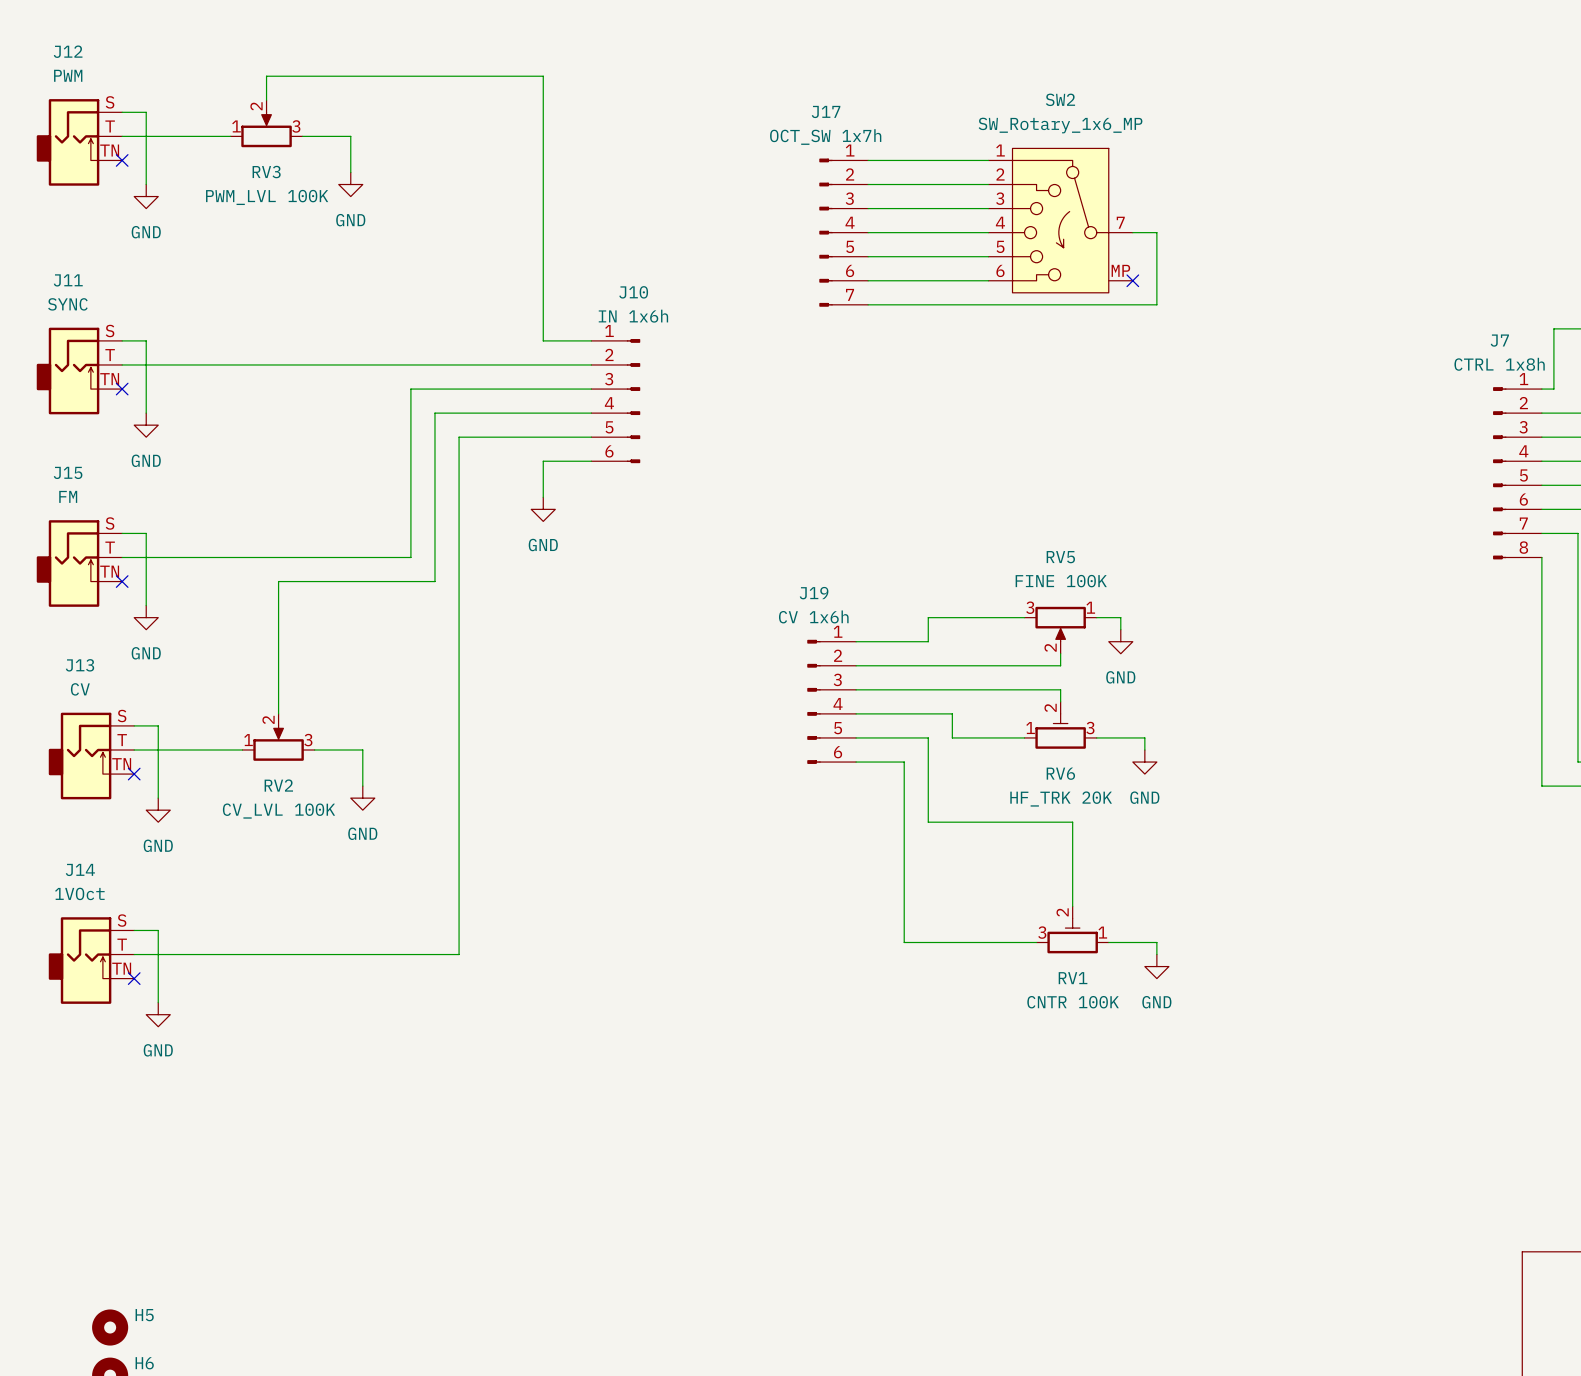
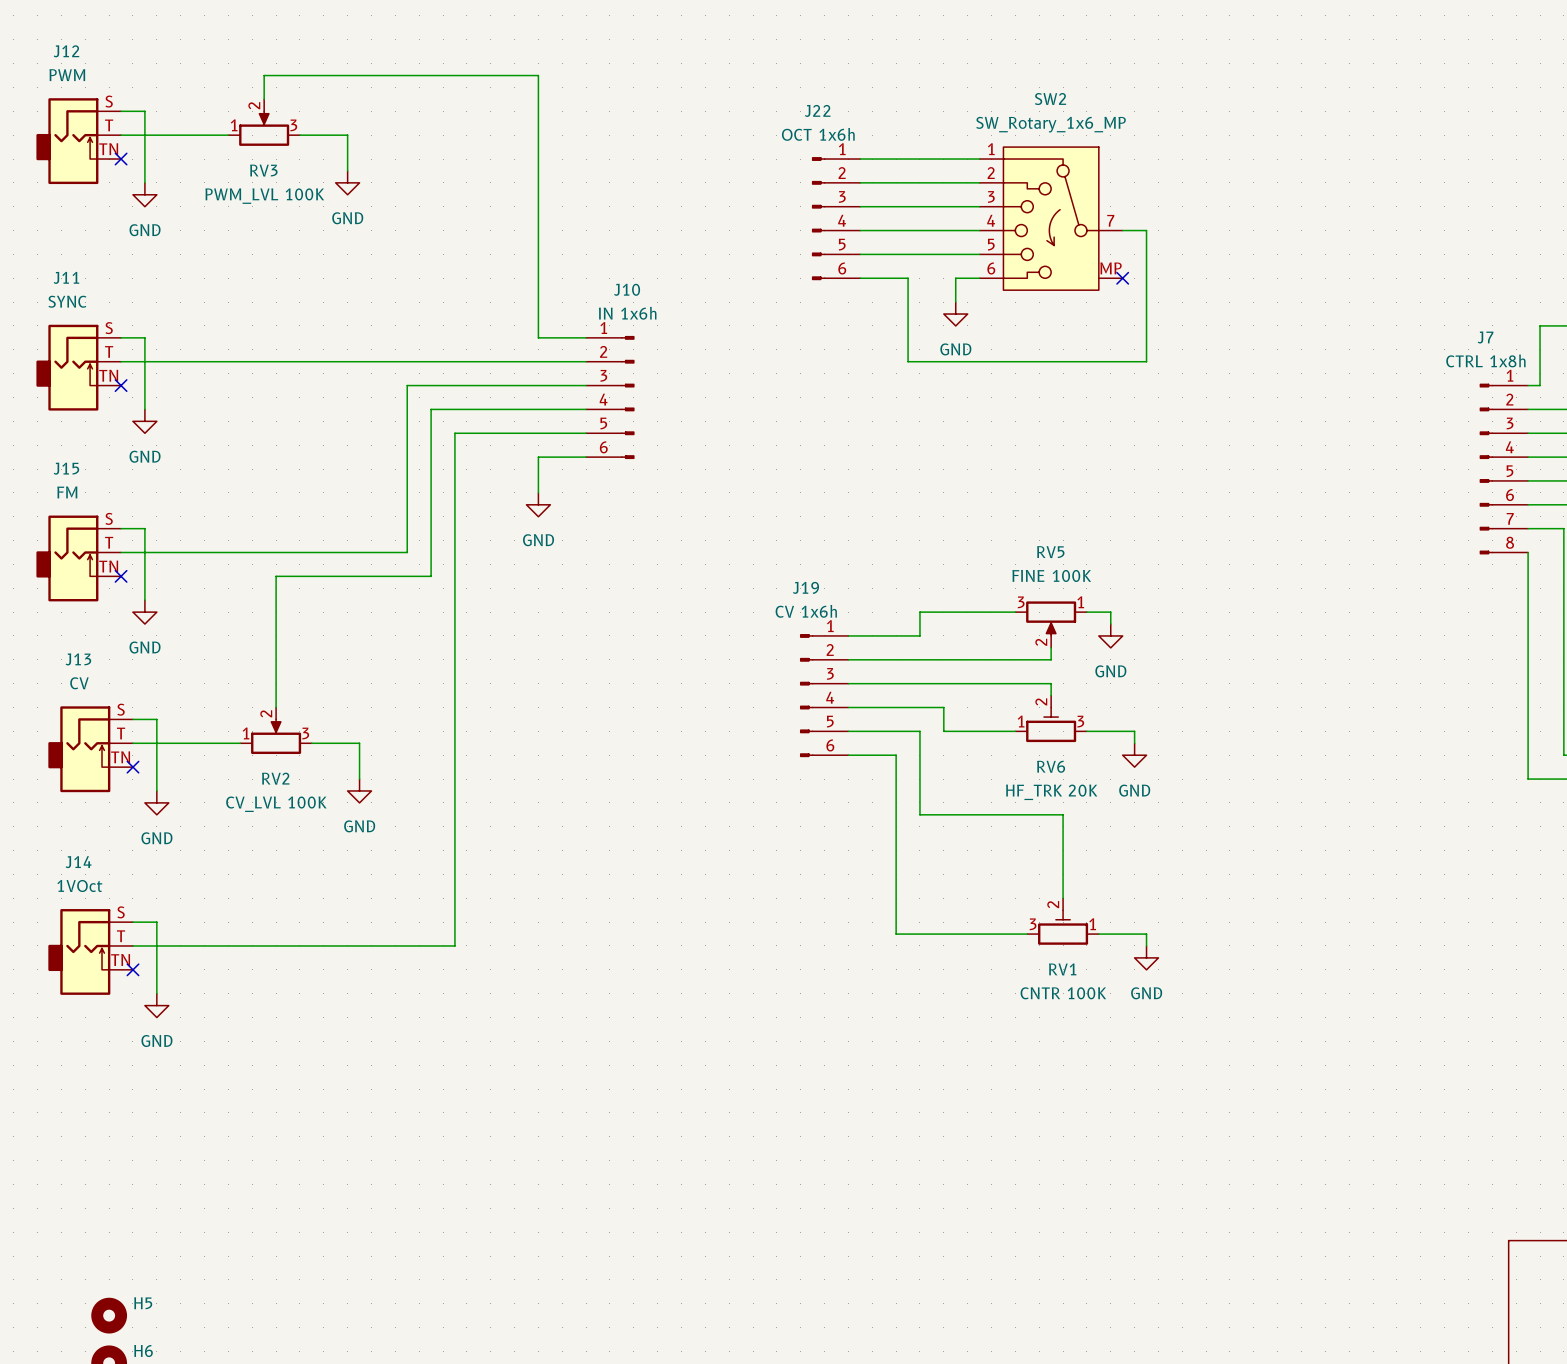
J22: none -> OCT 1x6h (836, 218)
J17: OCT_SW 1x7h (843, 232) -> none
wire: (916, 280) (964, 280) -> (955, 302) (955, 278)
wire: (868, 304) (1156, 304) -> (908, 278) (908, 361) (1146, 361) (1146, 302)
power symbol: none -> GND (955, 314)

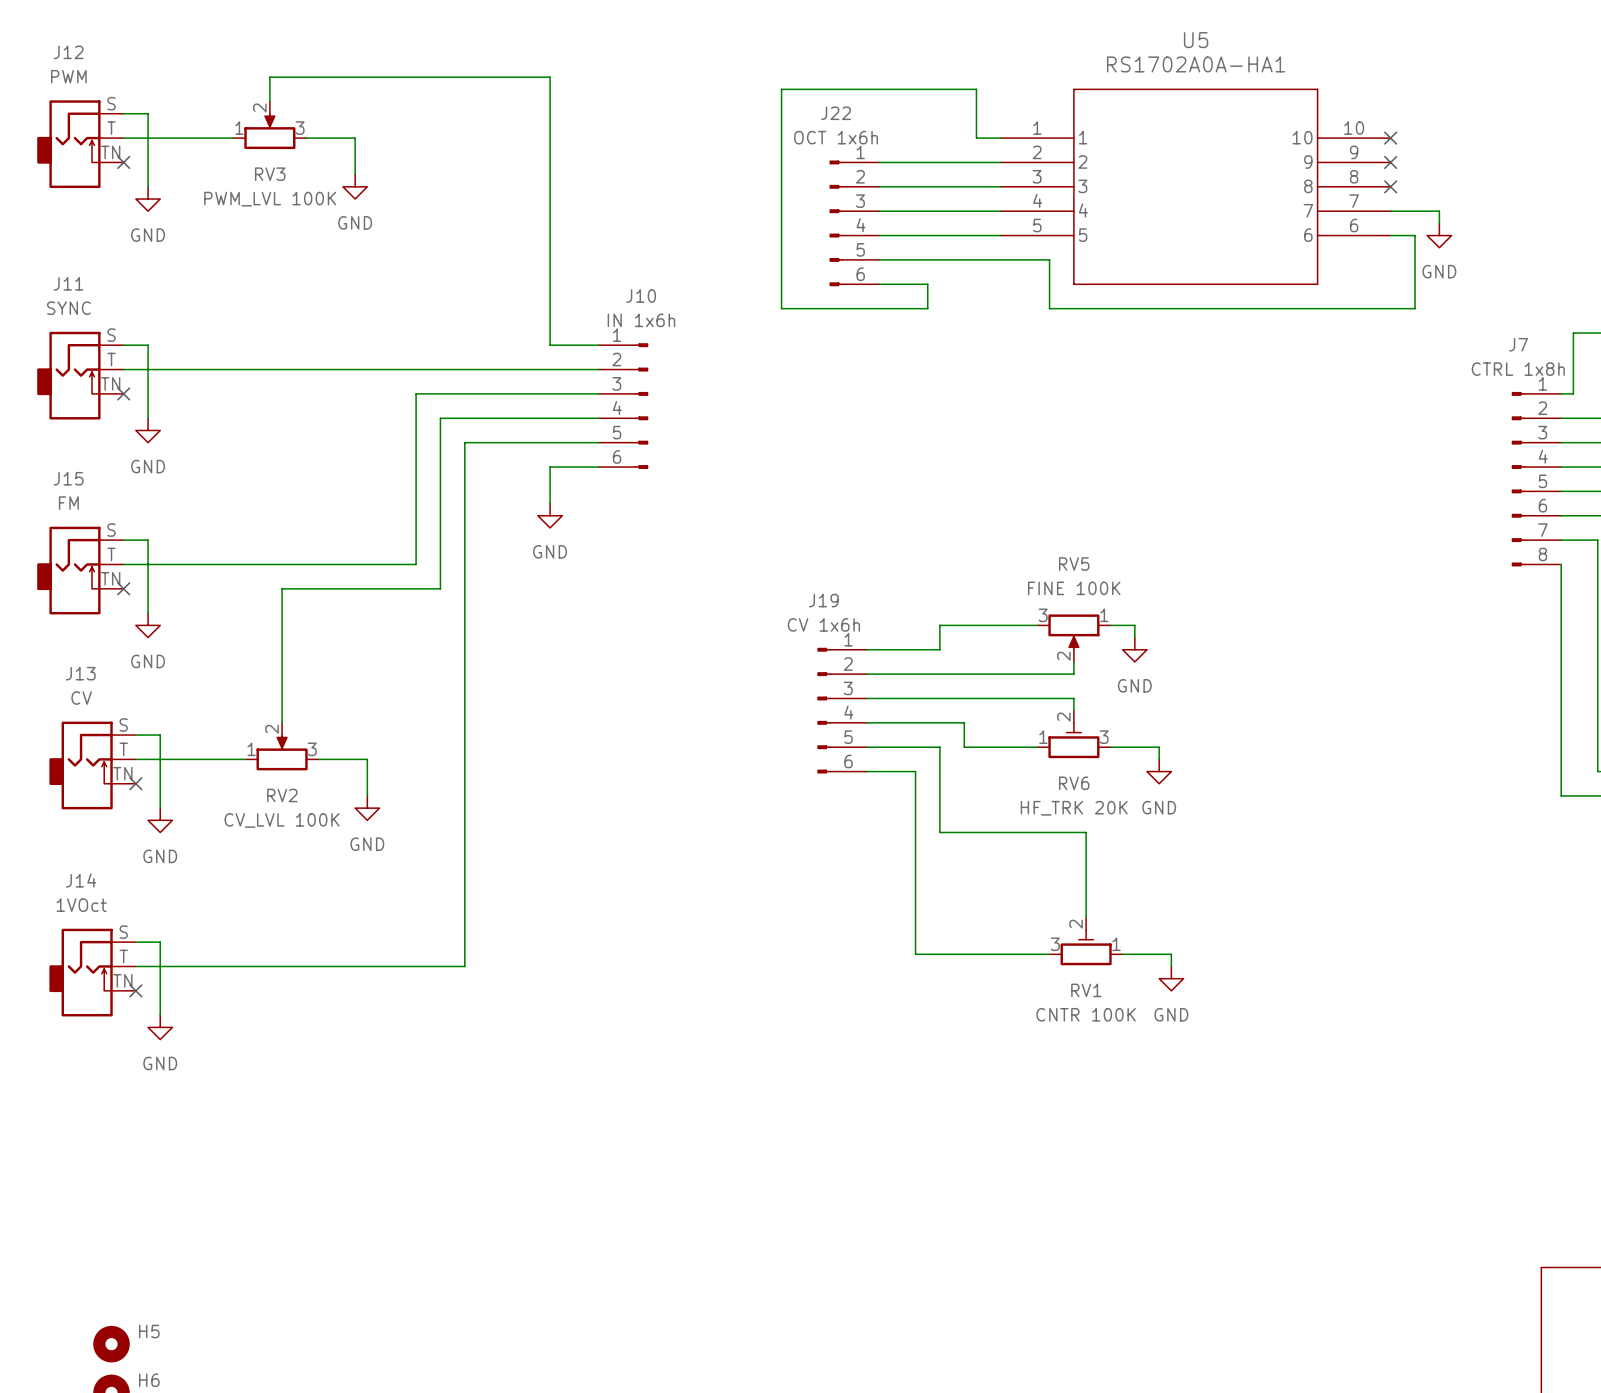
no-connect mark: none -> (1390, 138)
no-connect mark: none -> (1390, 162)
U5: none -> RS1702A0A-HA1 (1195, 186)
no-connect mark: none -> (1390, 186)
wire: none -> (1390, 211) (1439, 211) (1439, 223)
SW2: SW_Rotary_1x6_MP (1051, 218) -> none
wire: (1122, 230) (1146, 230) (1146, 361) (908, 361) (908, 302) -> (1000, 138) (976, 138) (976, 89) (781, 89) (781, 308) (927, 308)
wire: none -> (1390, 235) (1415, 235) (1415, 308) (1049, 308) (1049, 259) (1000, 259)
power symbol: none -> GND (1439, 235)
wire: (979, 278) (955, 278) (955, 302) -> none
no-connect mark: (1122, 278) -> none
power symbol: GND (955, 314) -> none

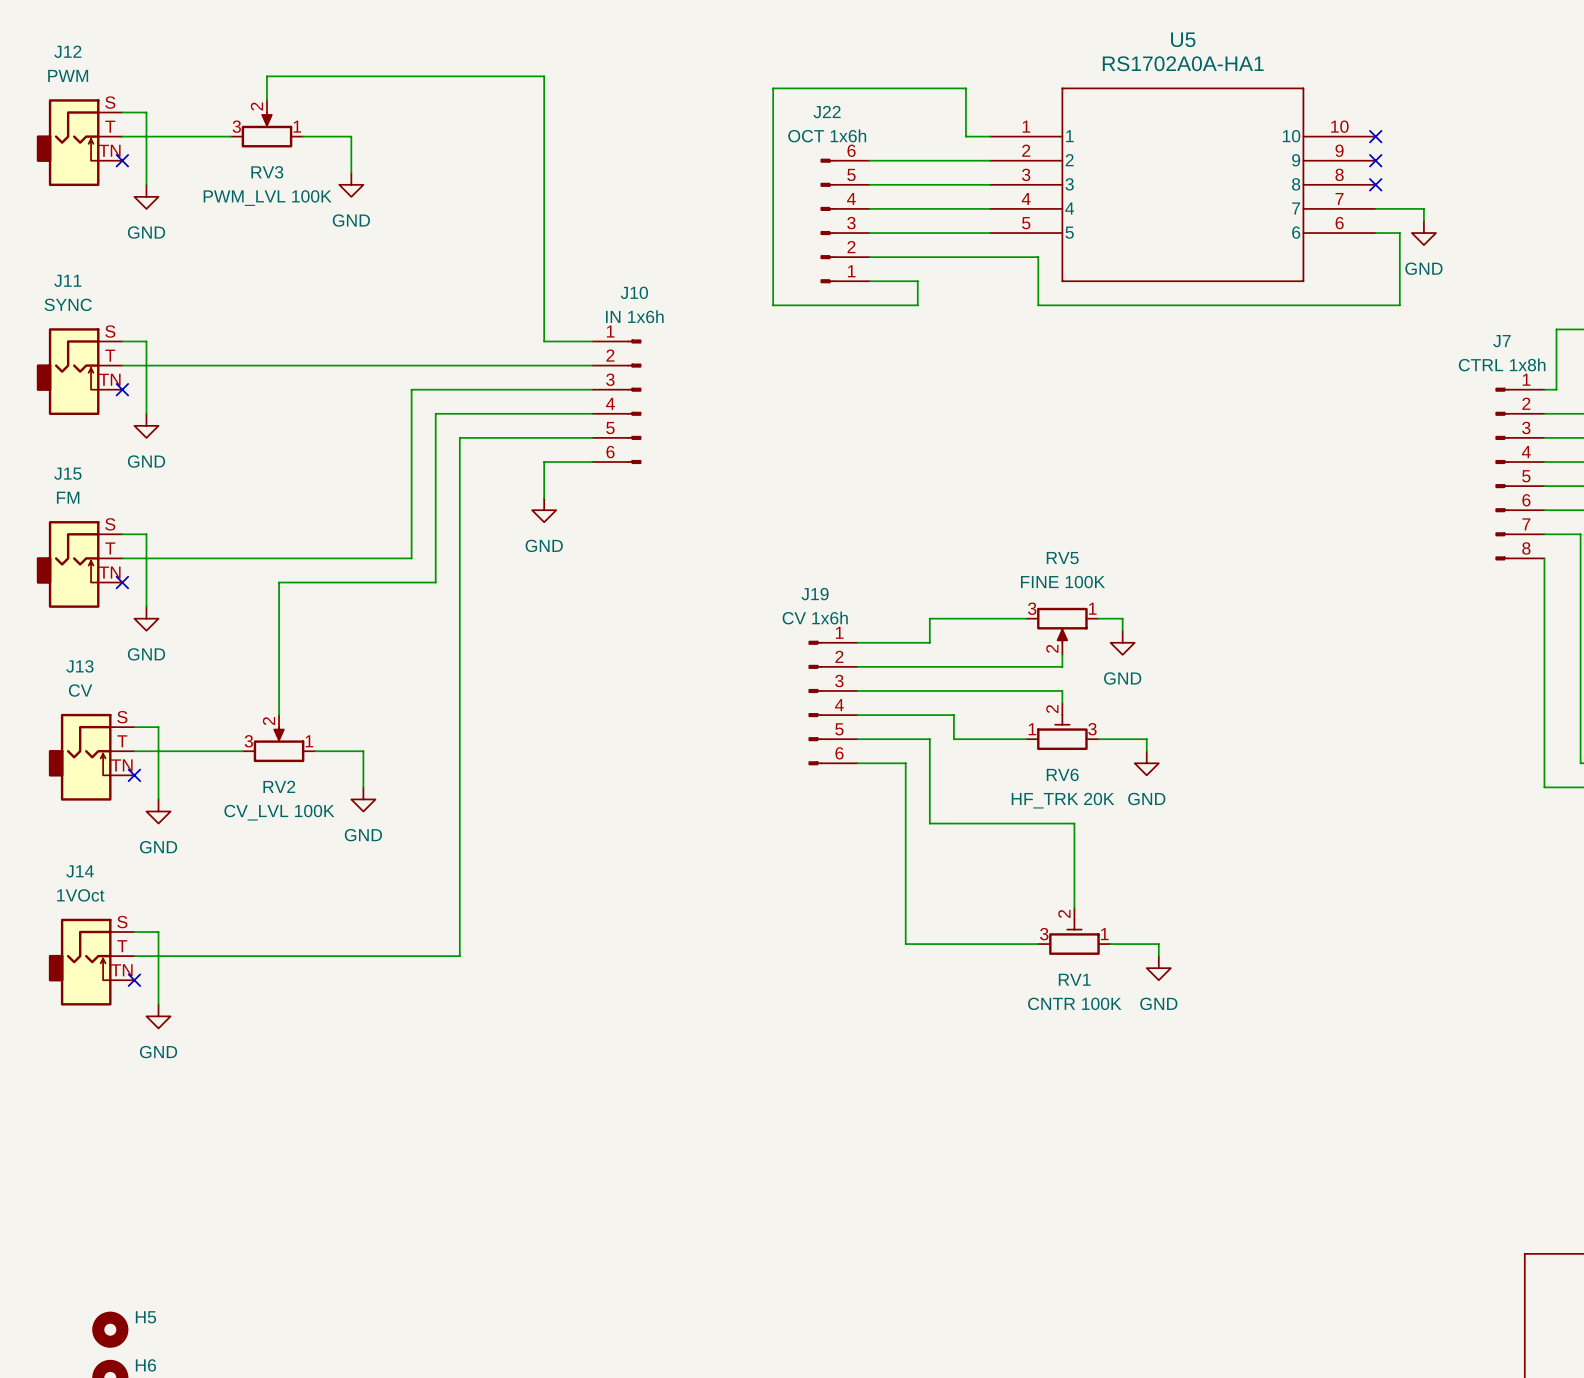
RV3 flip: as is (269, 131) -> left-right (266, 129)
J22 flip: as is (836, 223) -> up-down (827, 220)
RV2 flip: as is (282, 752) -> left-right (279, 744)

